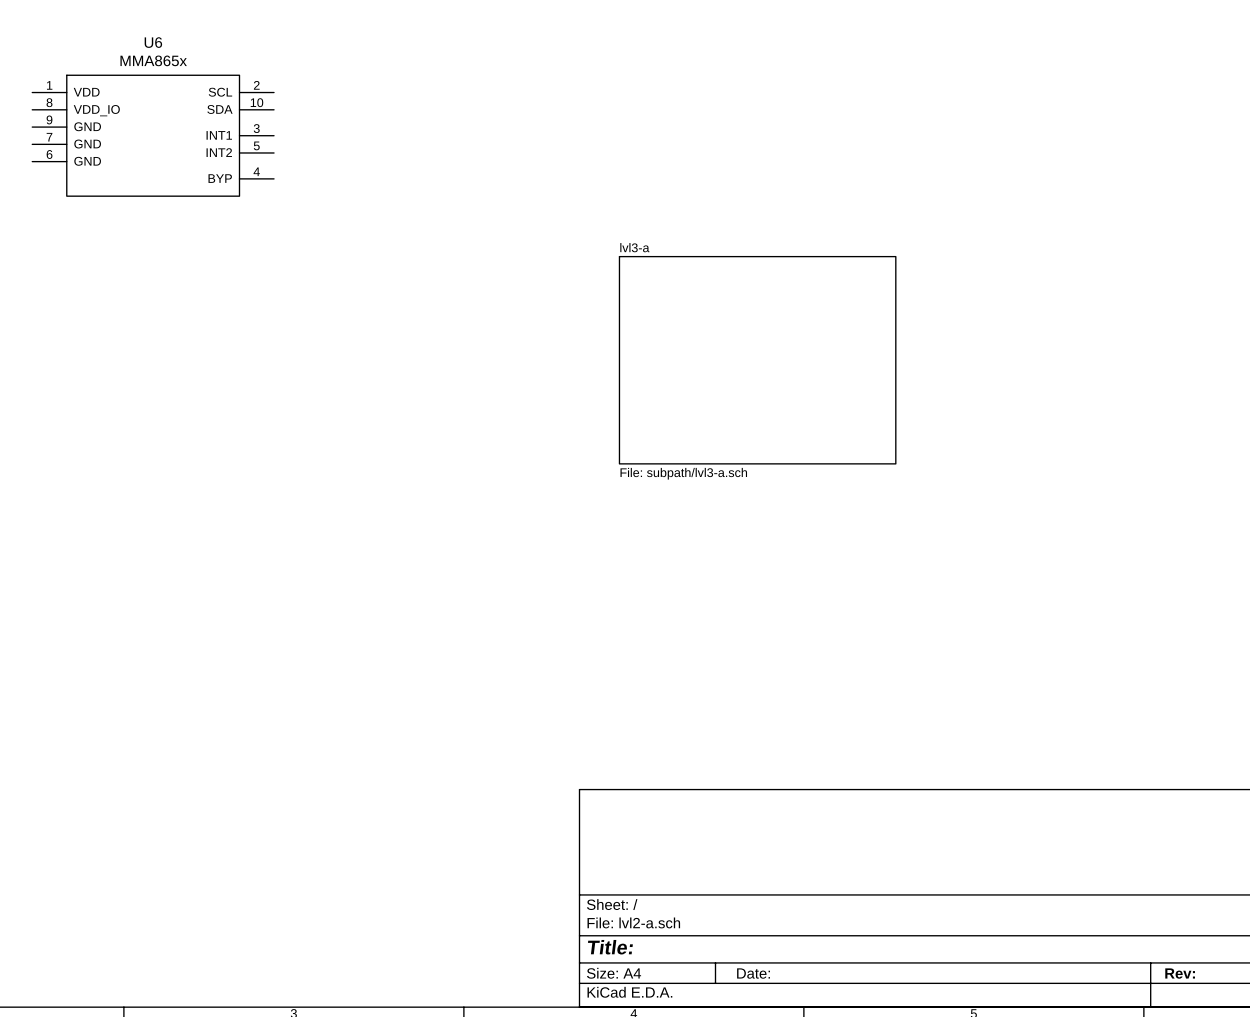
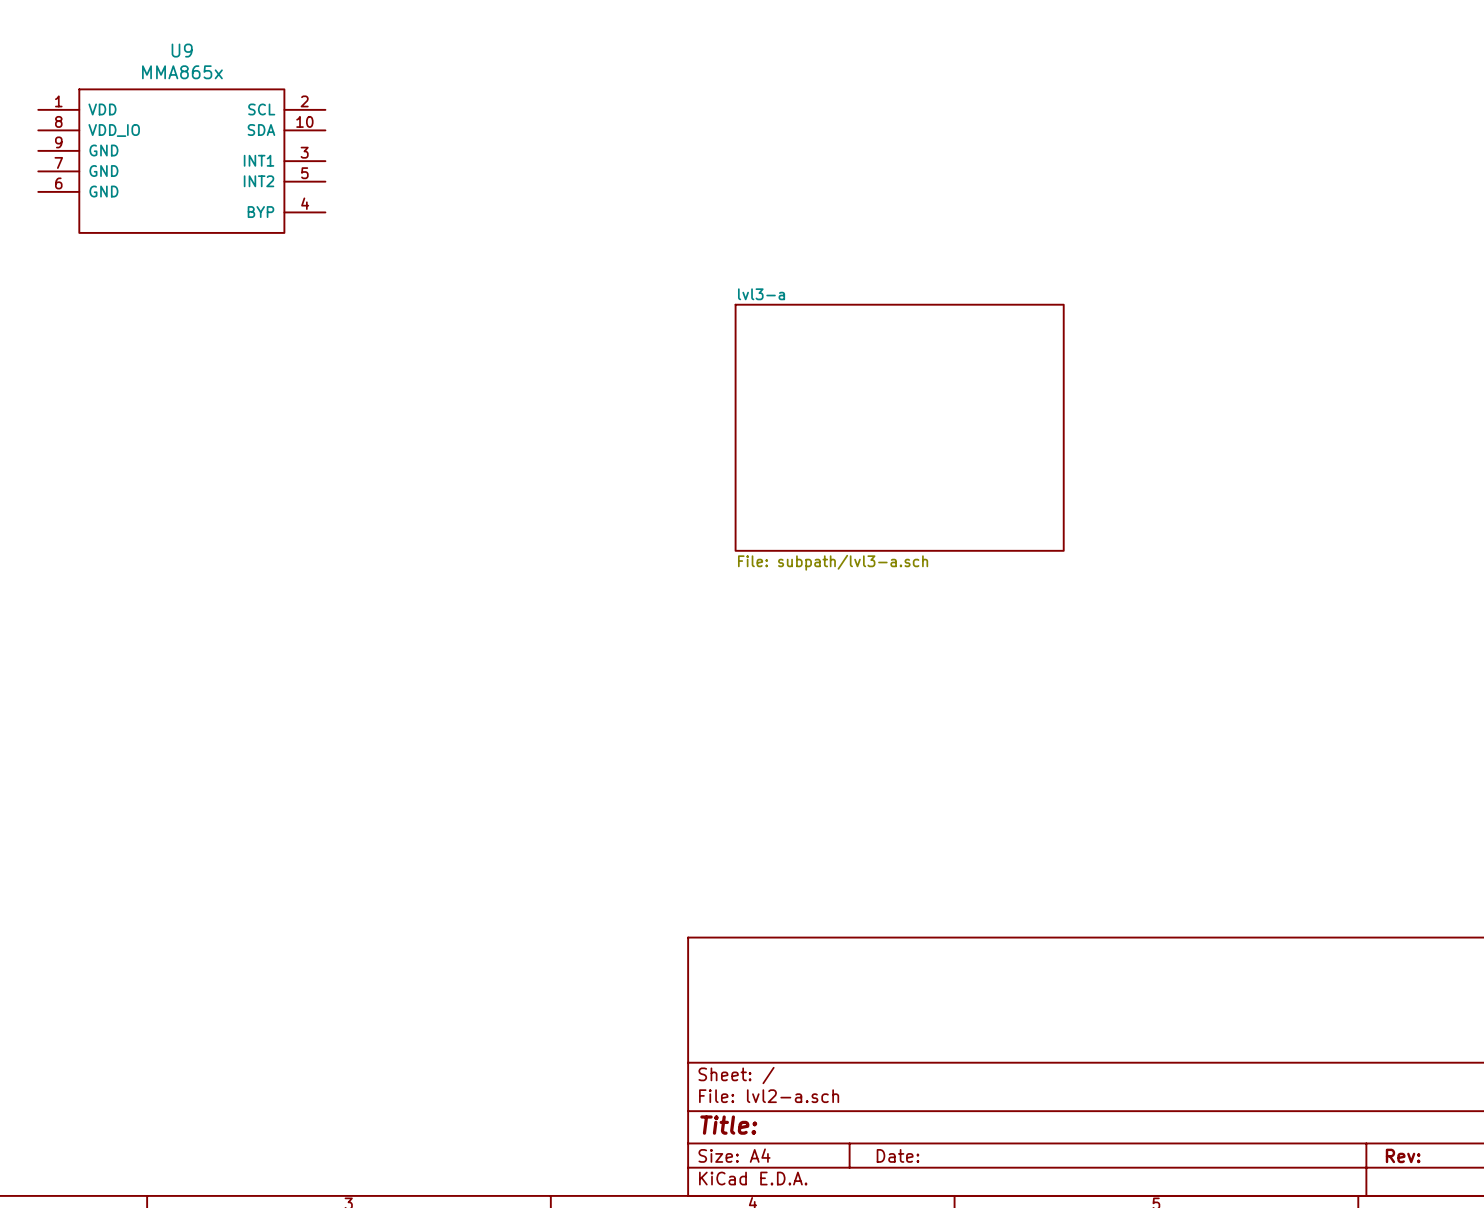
U6 name: U6 (153, 42) -> U9 (182, 50)

